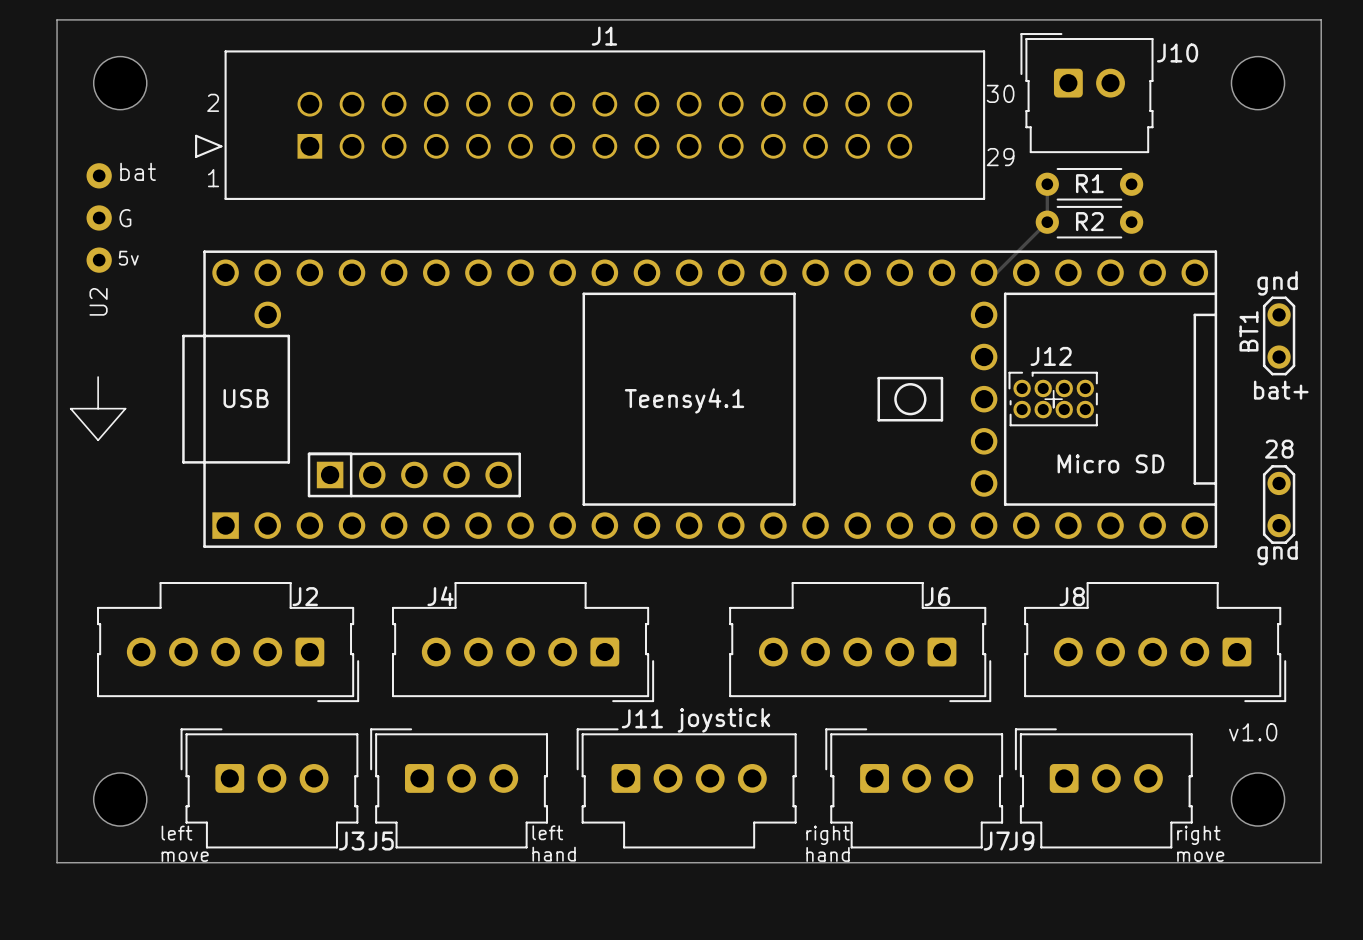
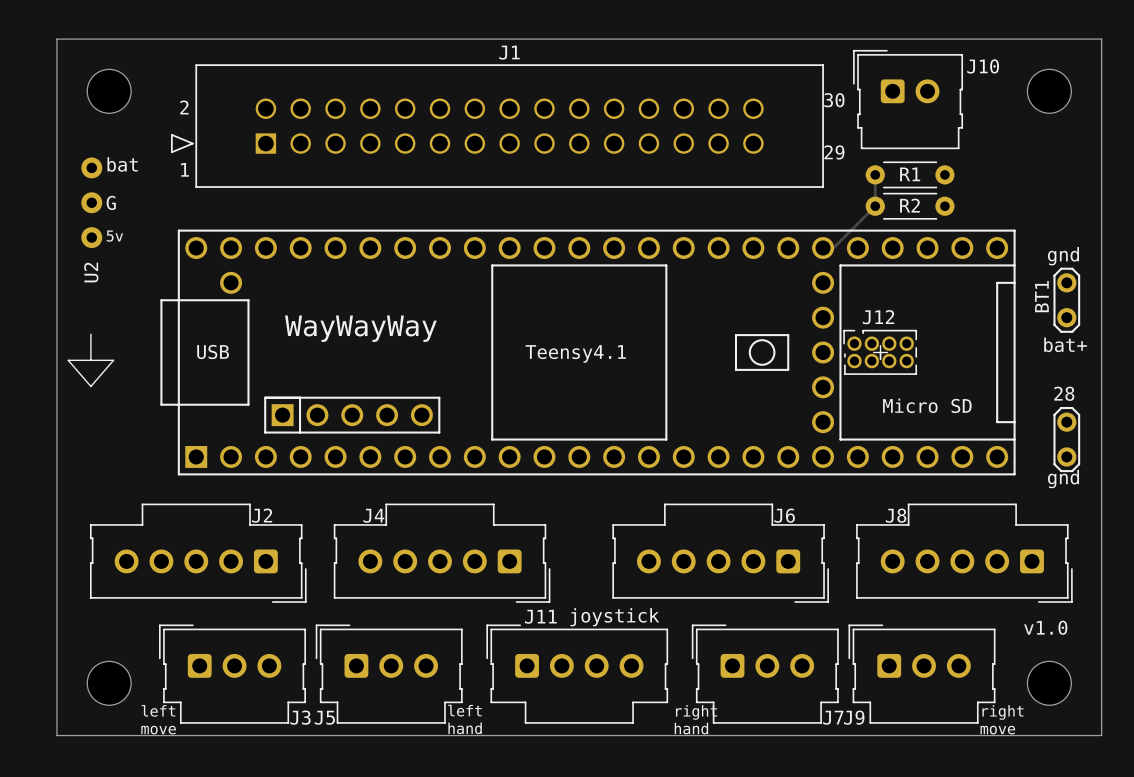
text: none -> WayWayWay (360, 328)

